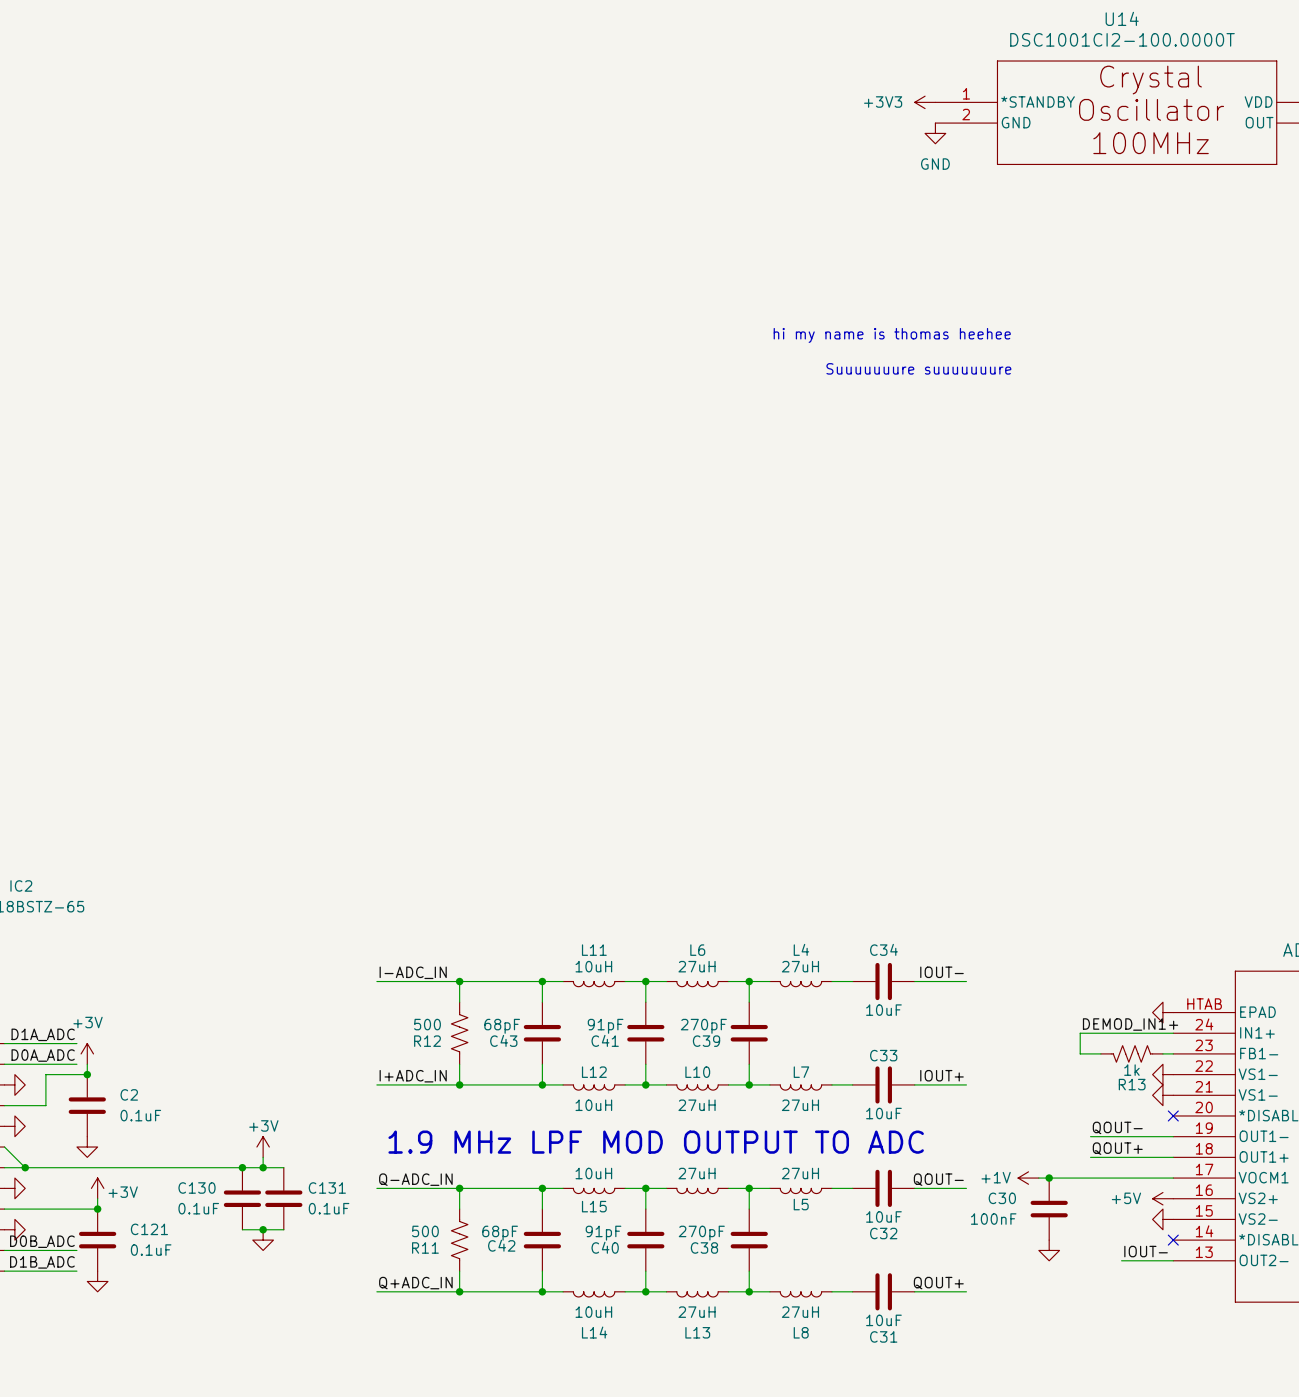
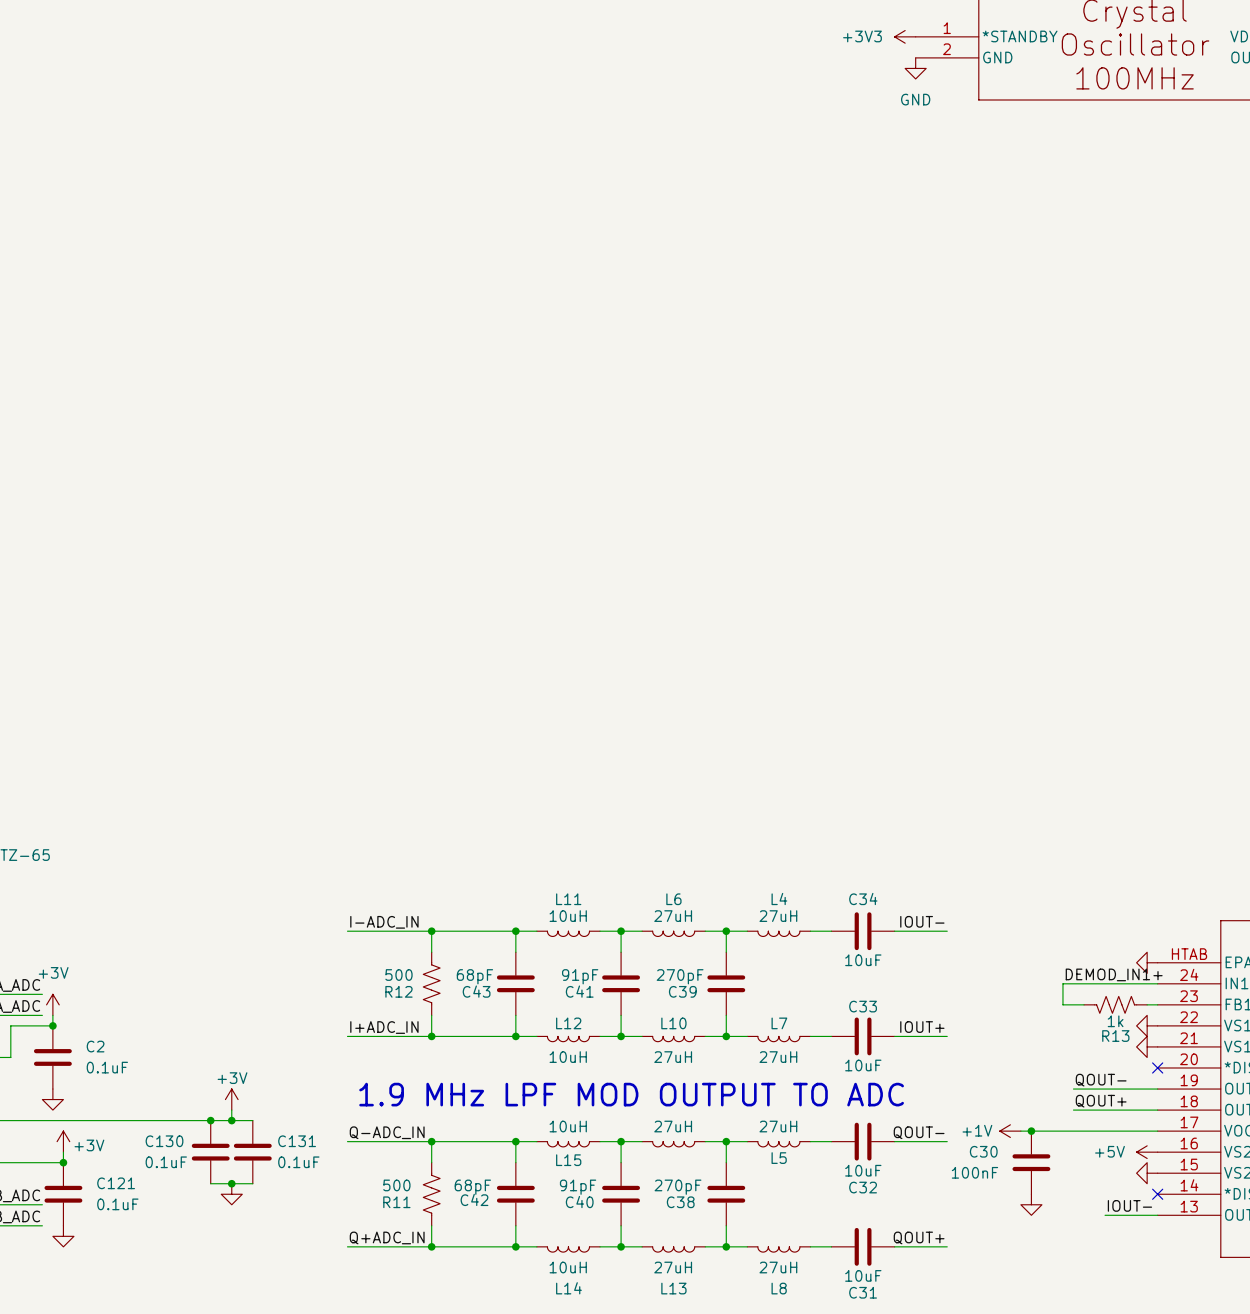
text: hi my name is thomas heehee (892, 335) -> none
text: Suuuuuuure suuuuuuure (918, 368) -> none

